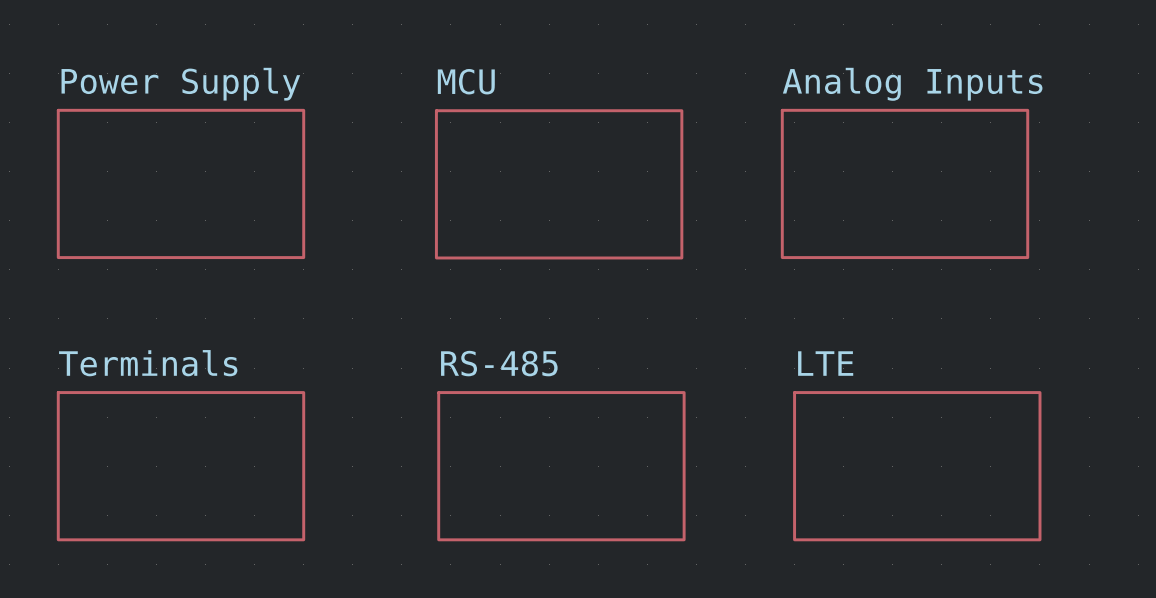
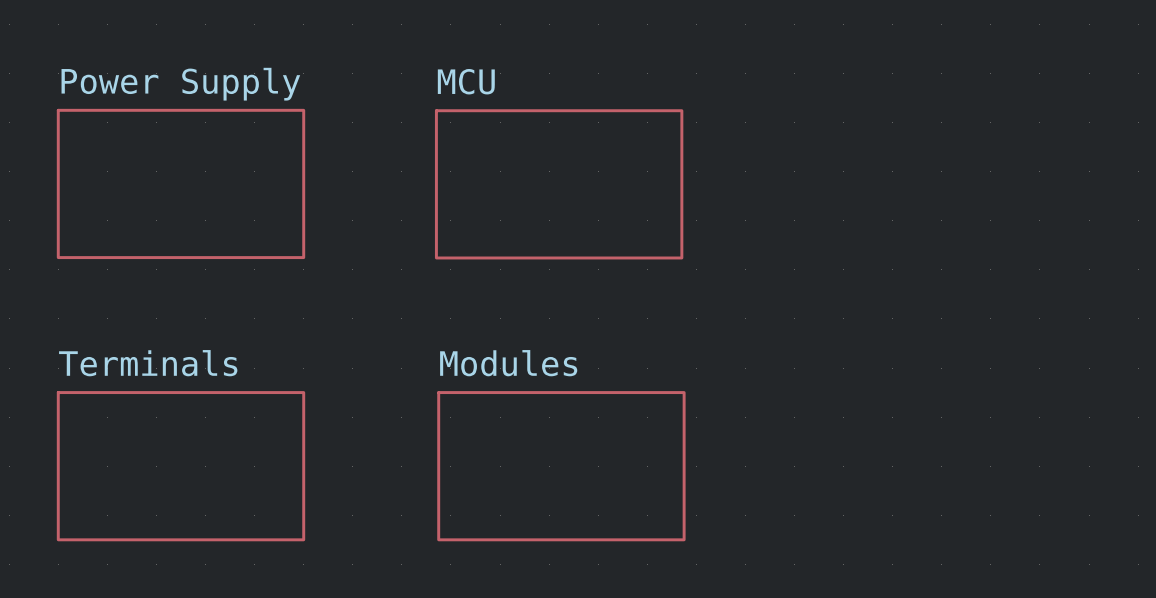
sheet Analog Inputs: (905, 183) -> none
sheet RS-485 name: RS-485 (499, 363) -> Modules (508, 363)
sheet LTE: (917, 466) -> none

